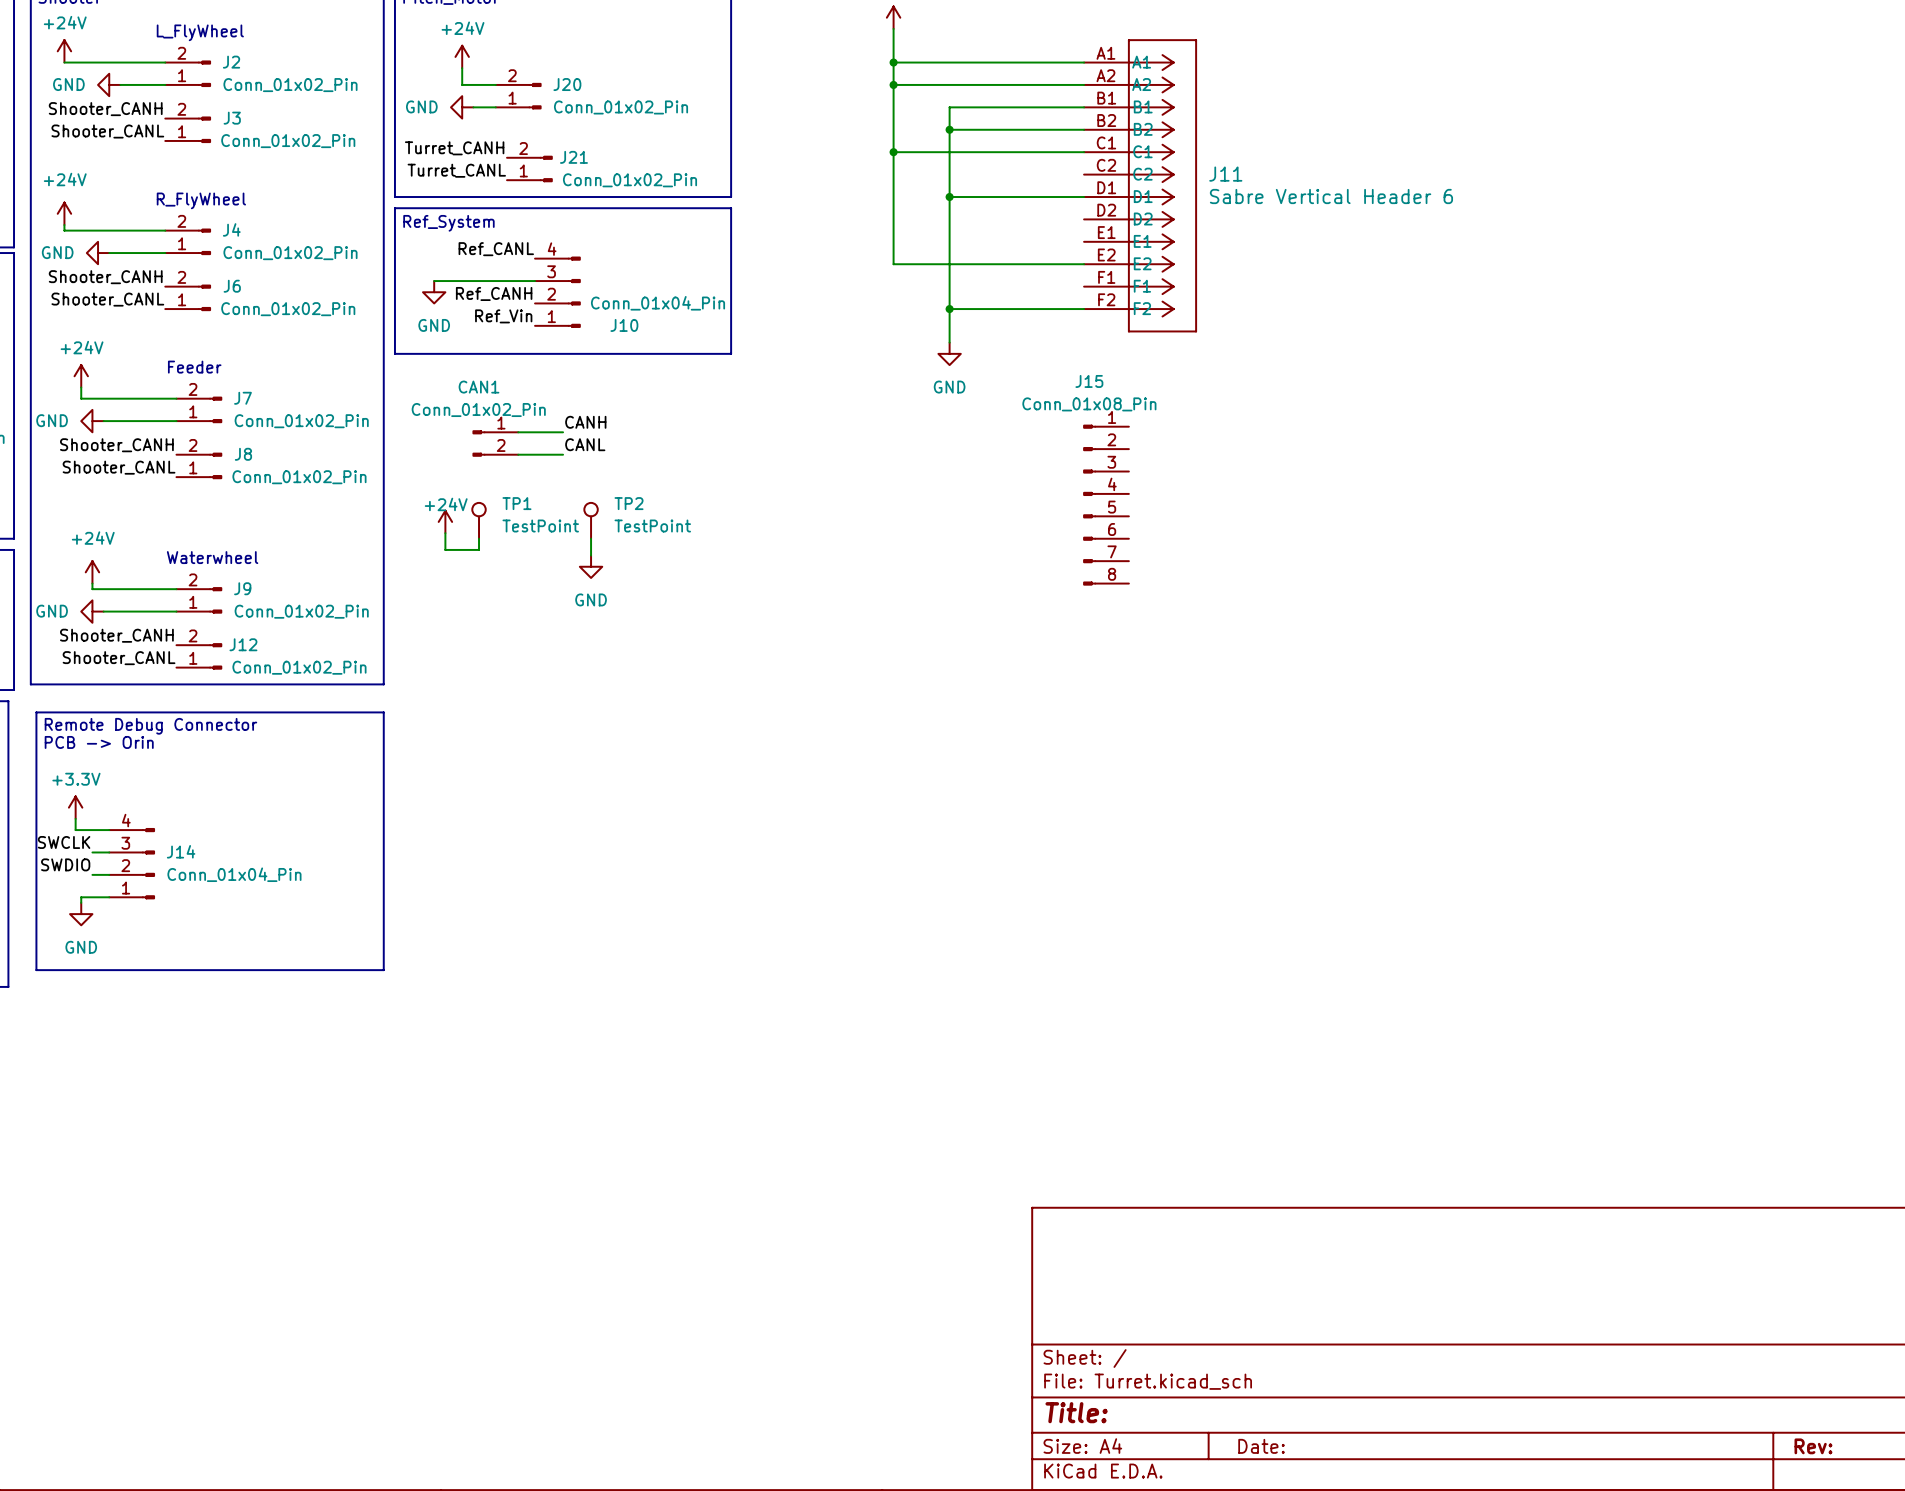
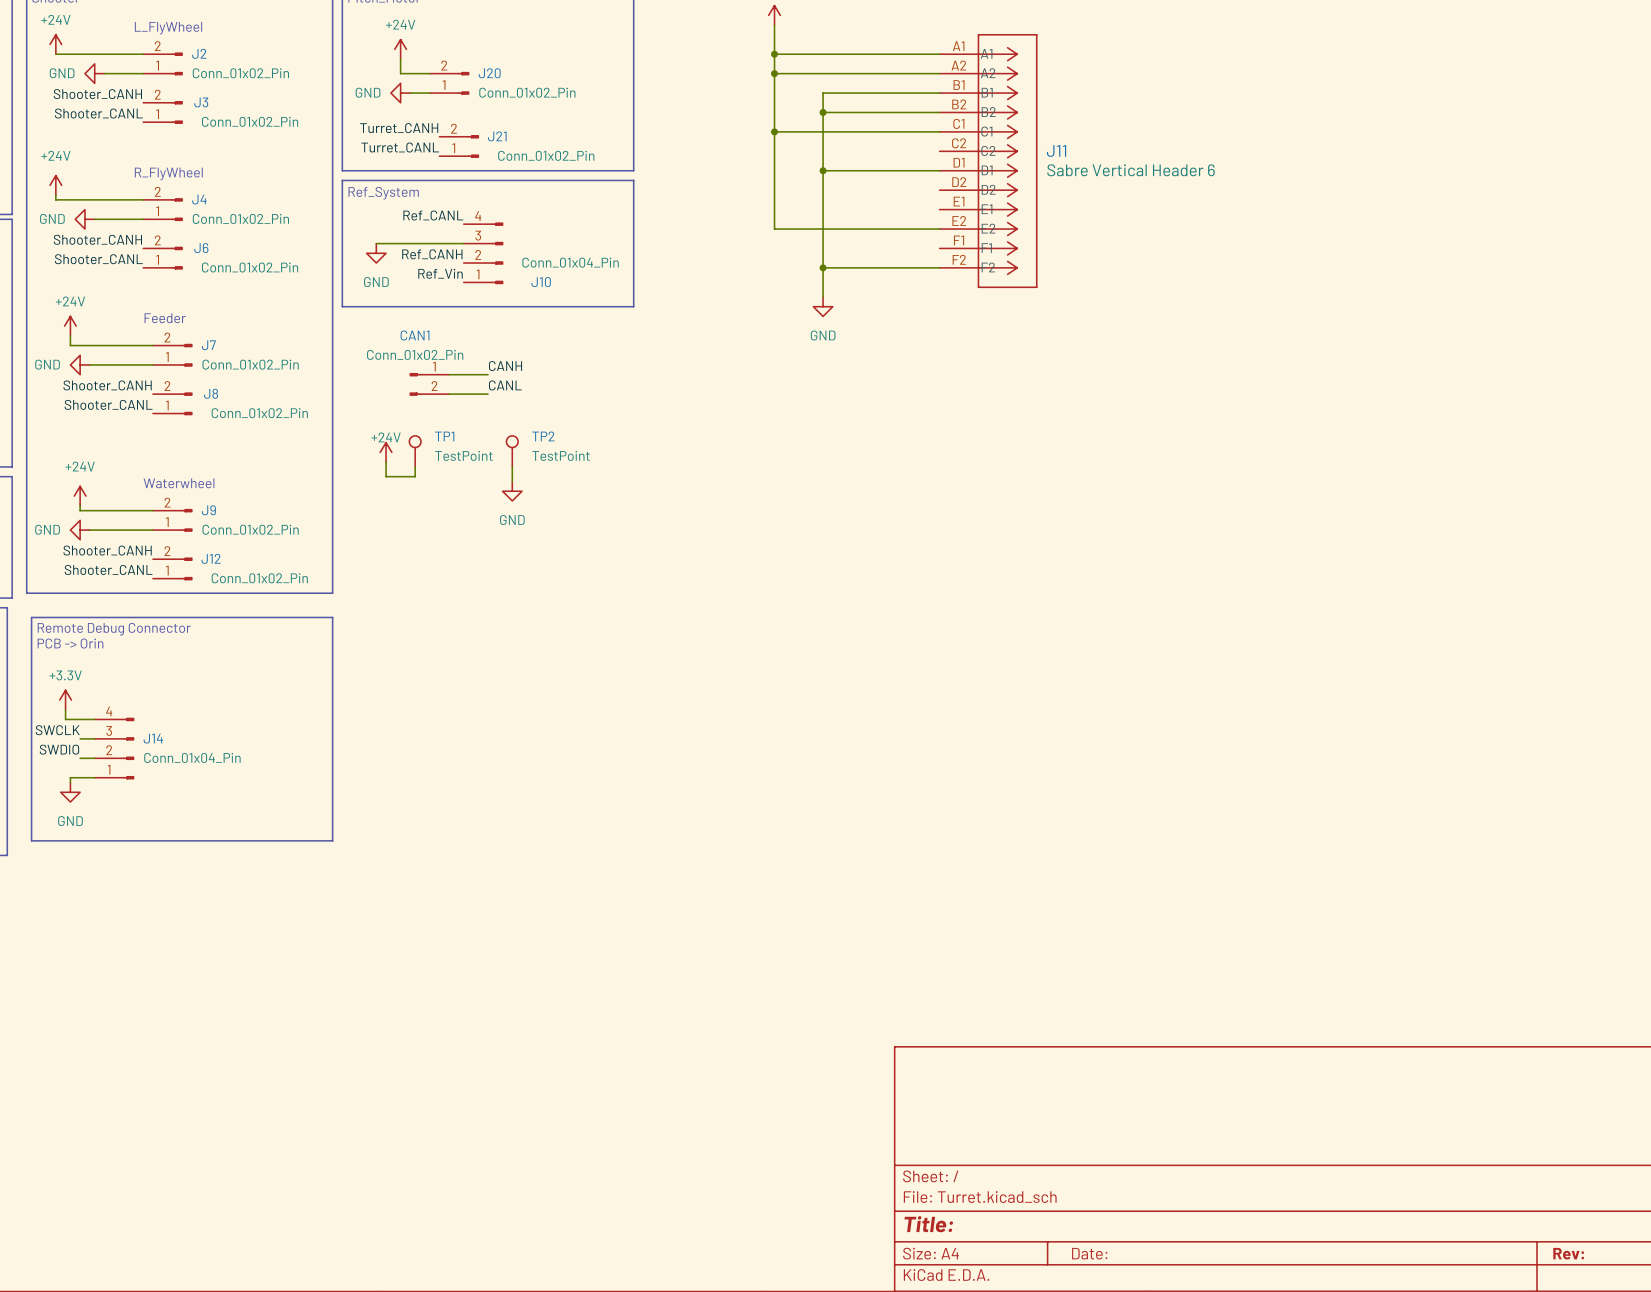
J15: Conn_01x08_Pin (1106, 505) -> none

